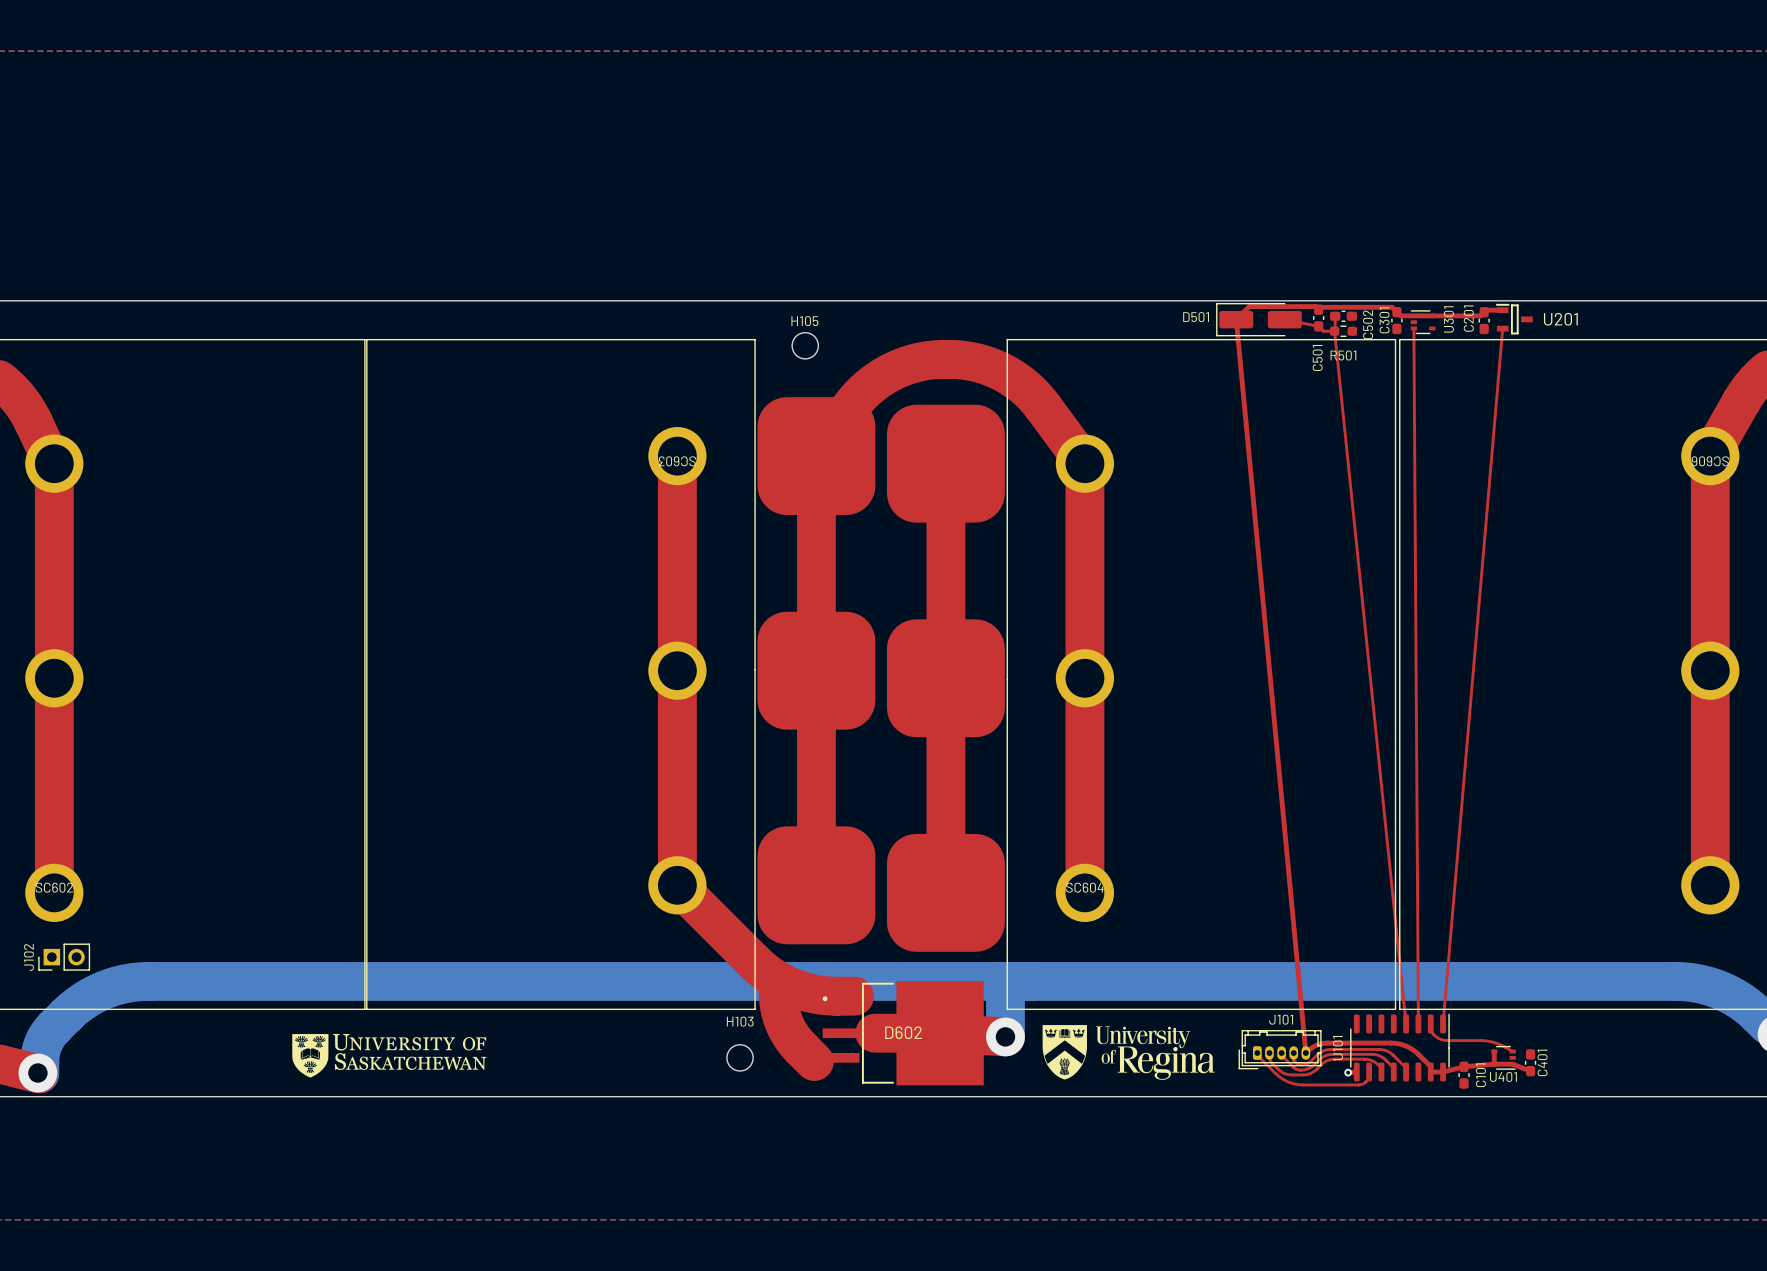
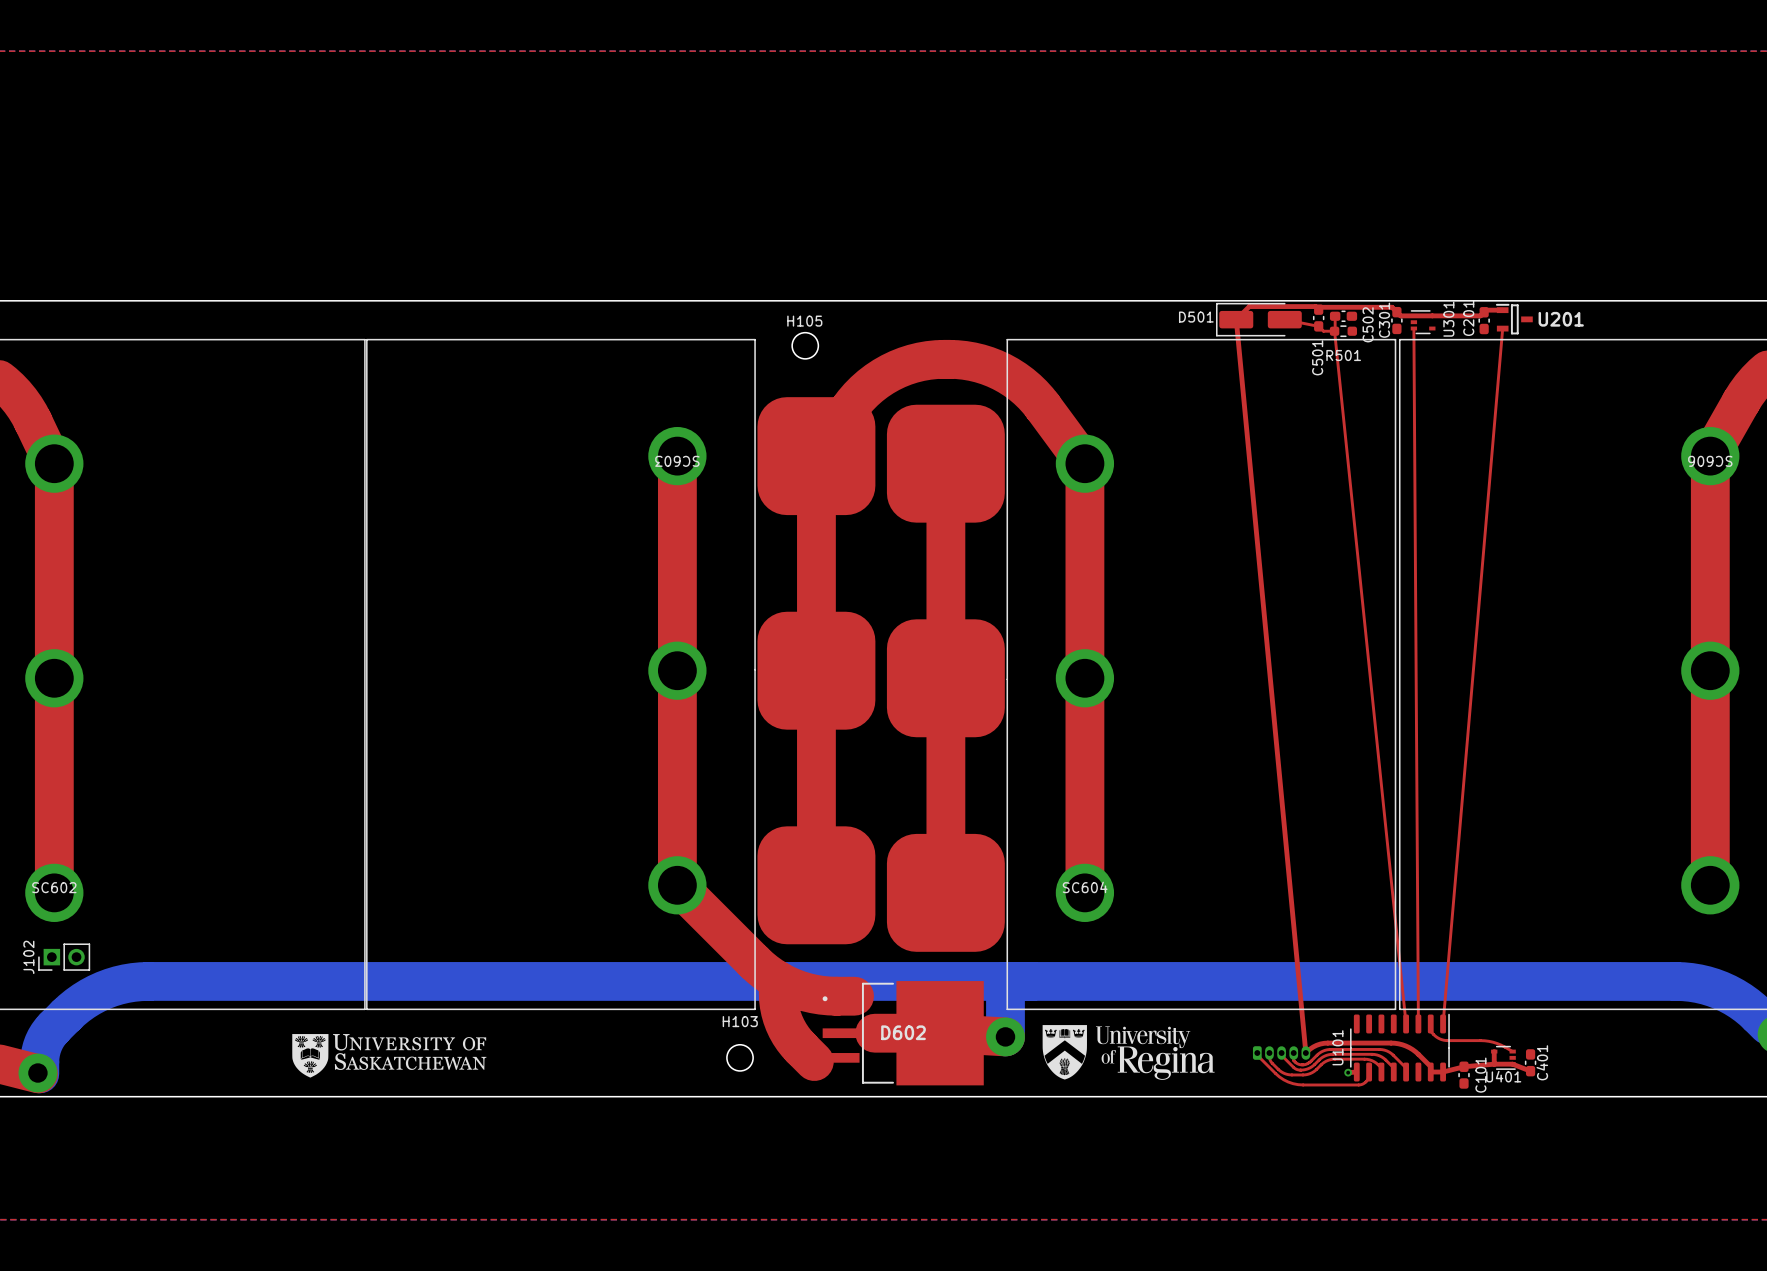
J101 side: top (1280, 1049) -> bottom (1281, 1053)

